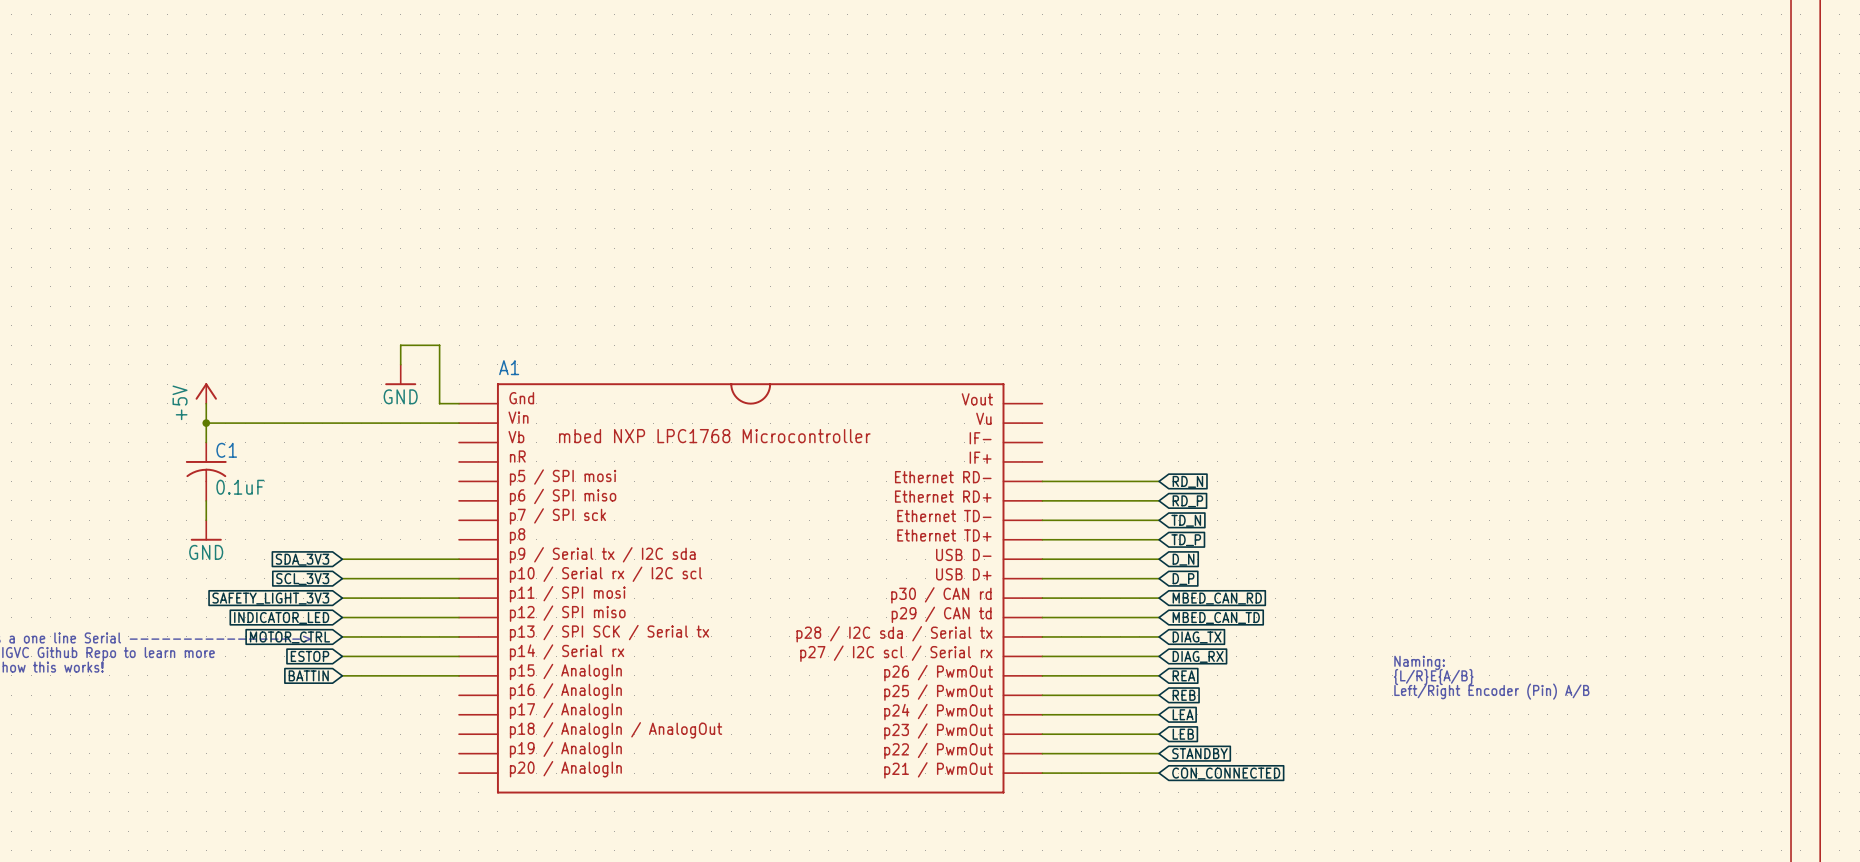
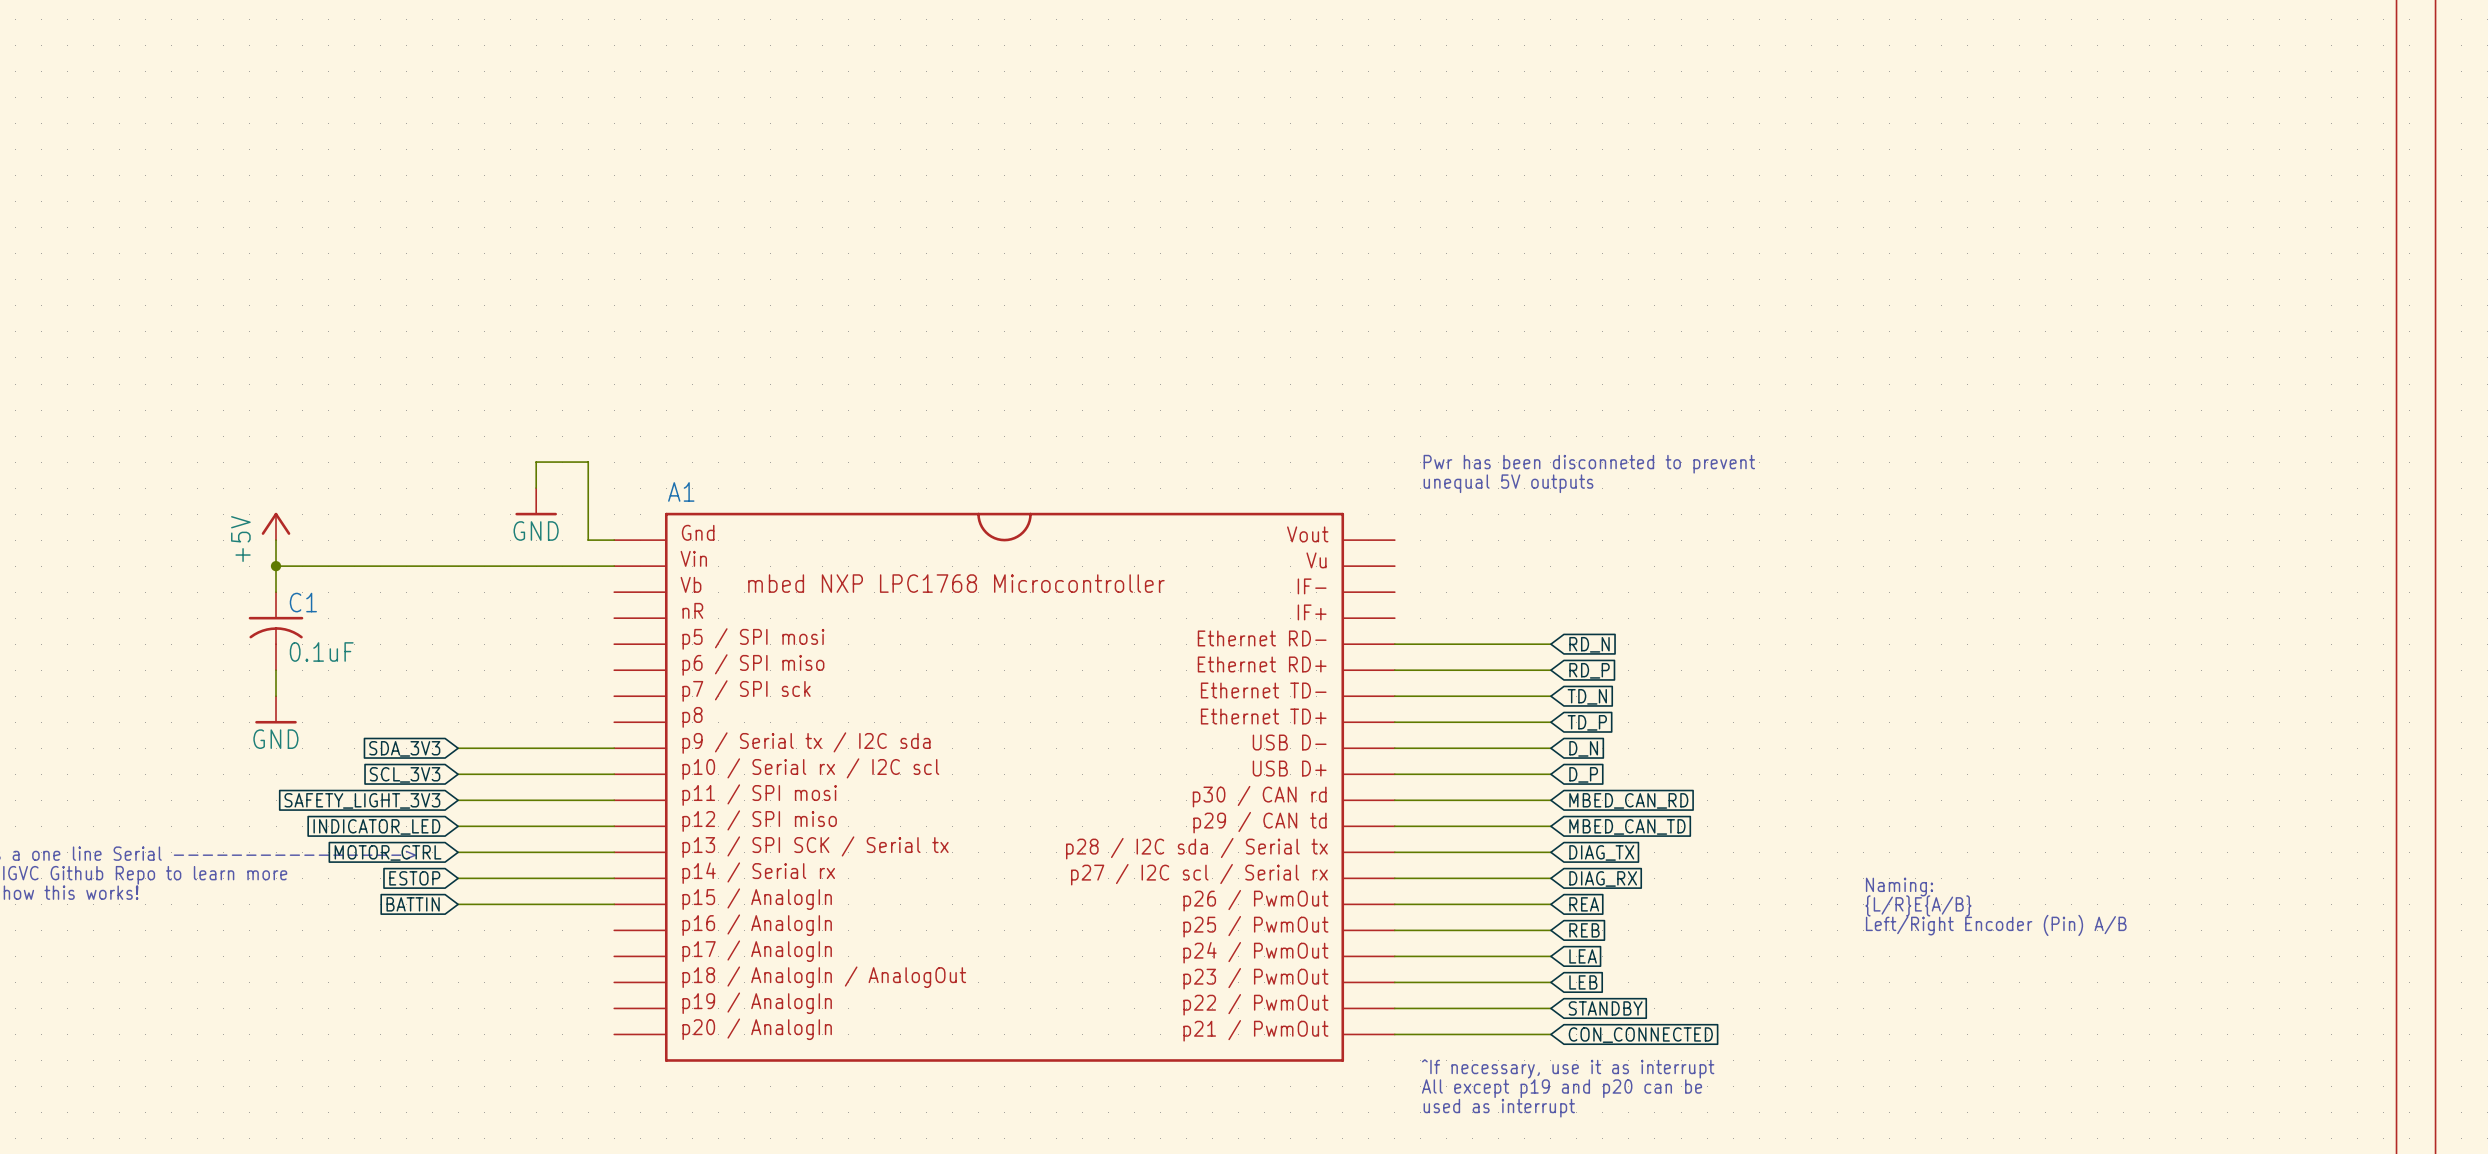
text: none -> Pwr has been disconneted to prevent (1589, 464)
text: none -> unequal 5V outputs (1508, 483)
text: none -> ^If necessary, use it as interrupt (1568, 1068)
text: none -> All except p19 and p20 can be (1562, 1088)
text: none -> used as interrupt (1499, 1108)

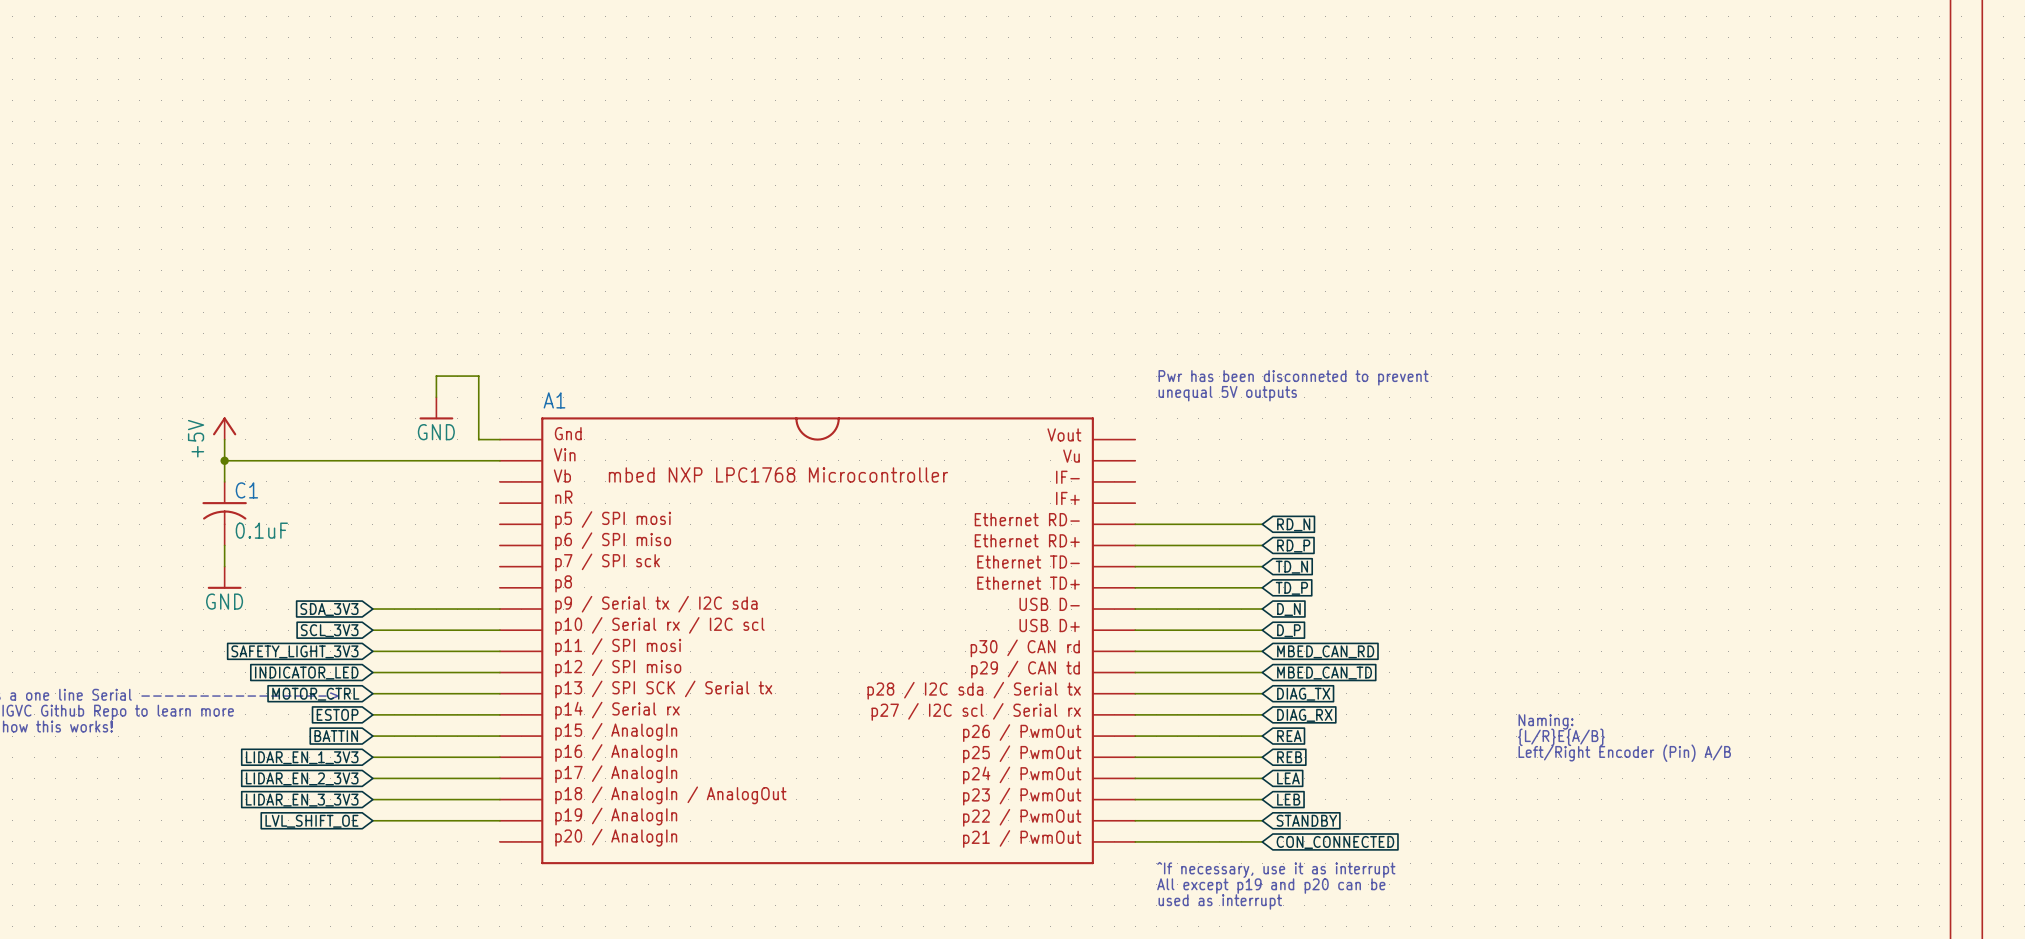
wire: none -> (372, 757) (499, 757)
global label: none -> LIDAR_EN_1_3V3 (302, 757)
wire: none -> (372, 778) (499, 778)
global label: none -> LIDAR_EN_2_3V3 (302, 778)
wire: none -> (372, 799) (499, 799)
global label: none -> LIDAR_EN_3_3V3 (302, 800)
wire: none -> (372, 820) (499, 820)
global label: none -> LVL_SHIFT_OE (311, 821)

